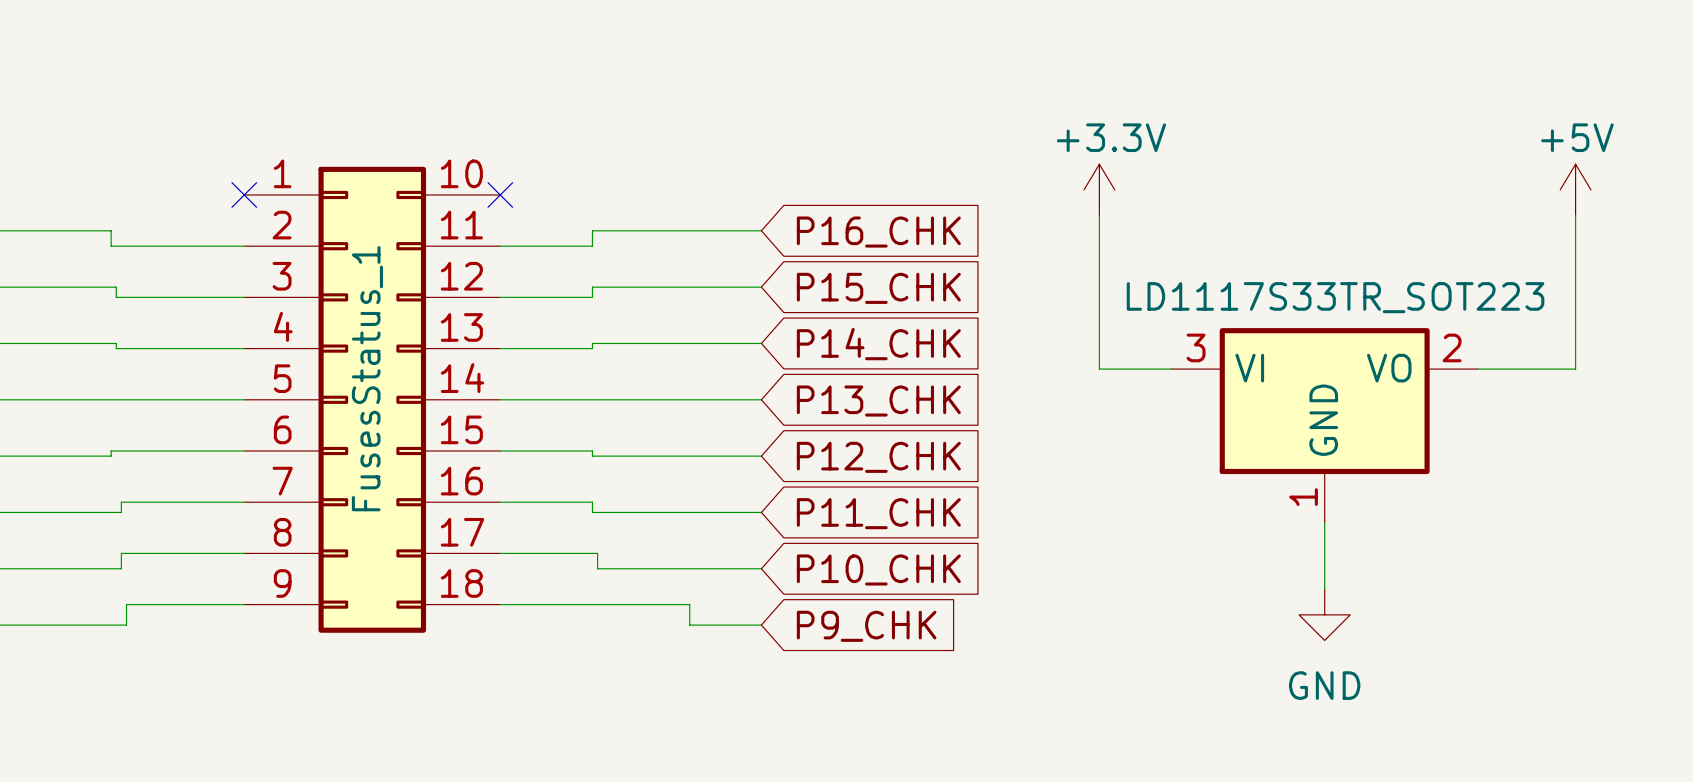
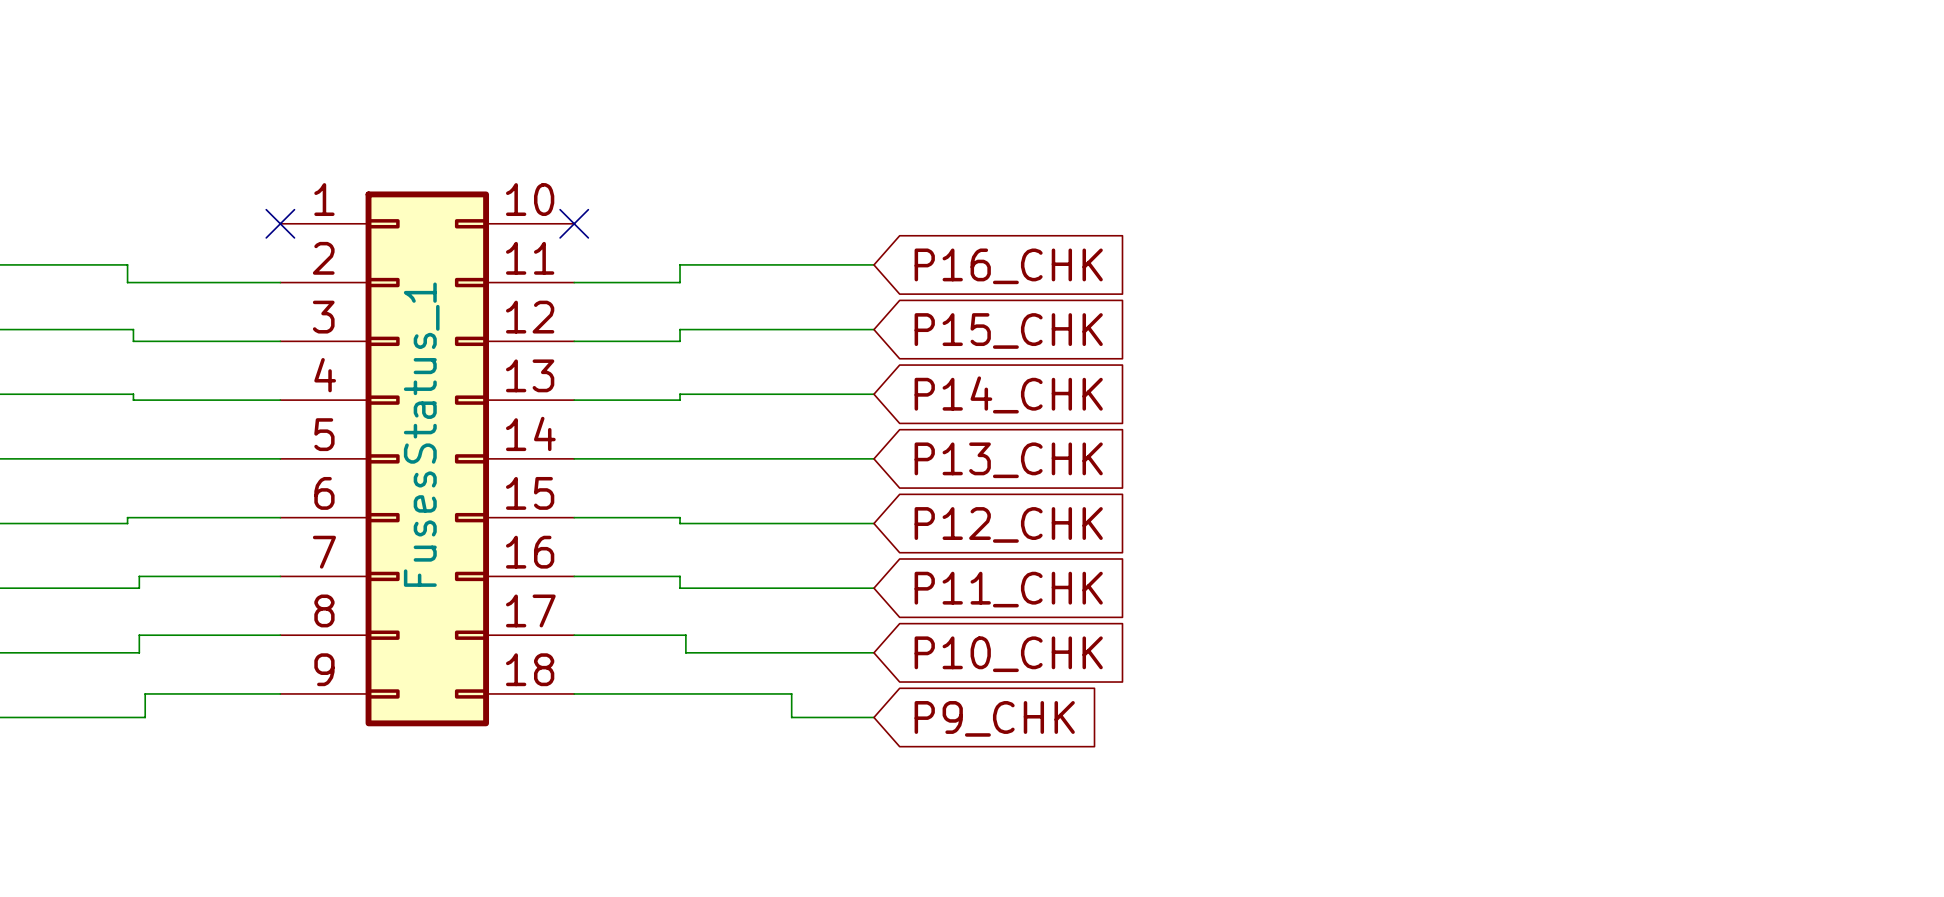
power symbol: +3.3V (1099, 189) -> none
power symbol: +5V (1575, 189) -> none
wire: (1099, 215) (1099, 369) (1171, 369) -> none
wire: (1575, 215) (1575, 369) (1478, 369) -> none
part: LD1117S33TR_SOT223 (1324, 425) -> none
wire: (1324, 522) (1324, 589) -> none
power symbol: GND (1324, 614) -> none

